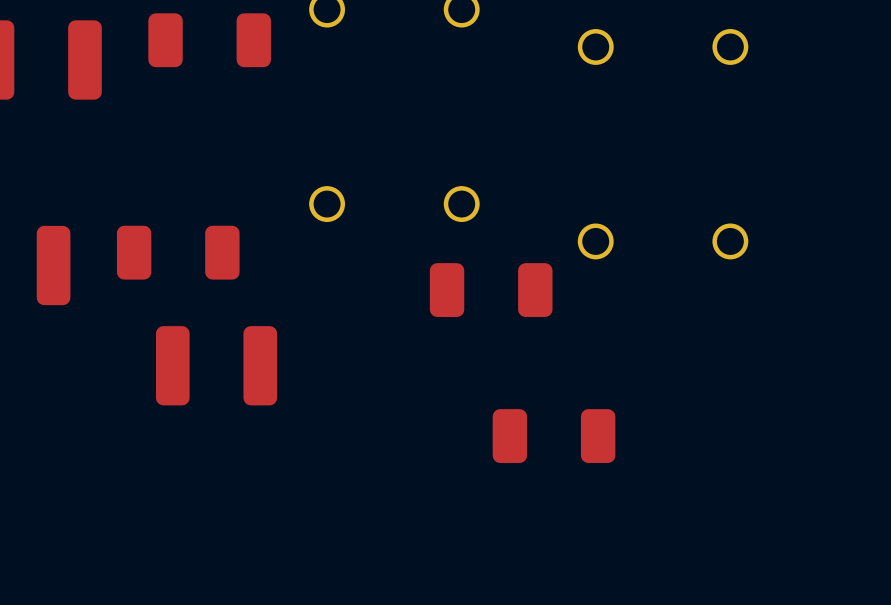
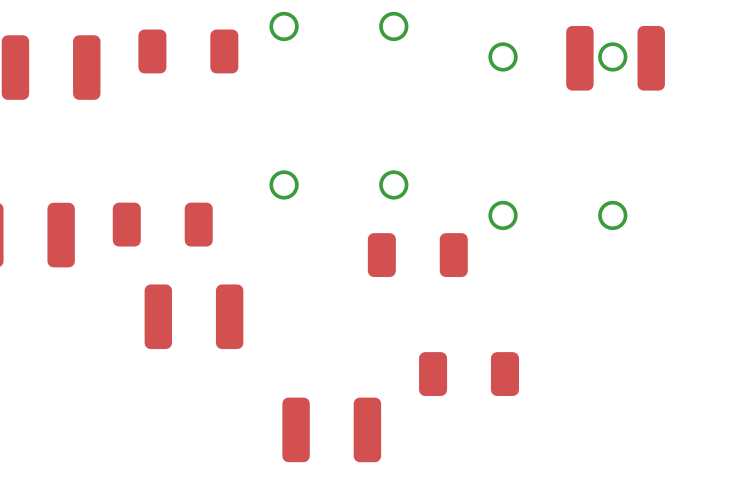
part: none -> (615, 58)
part: none -> (331, 429)

